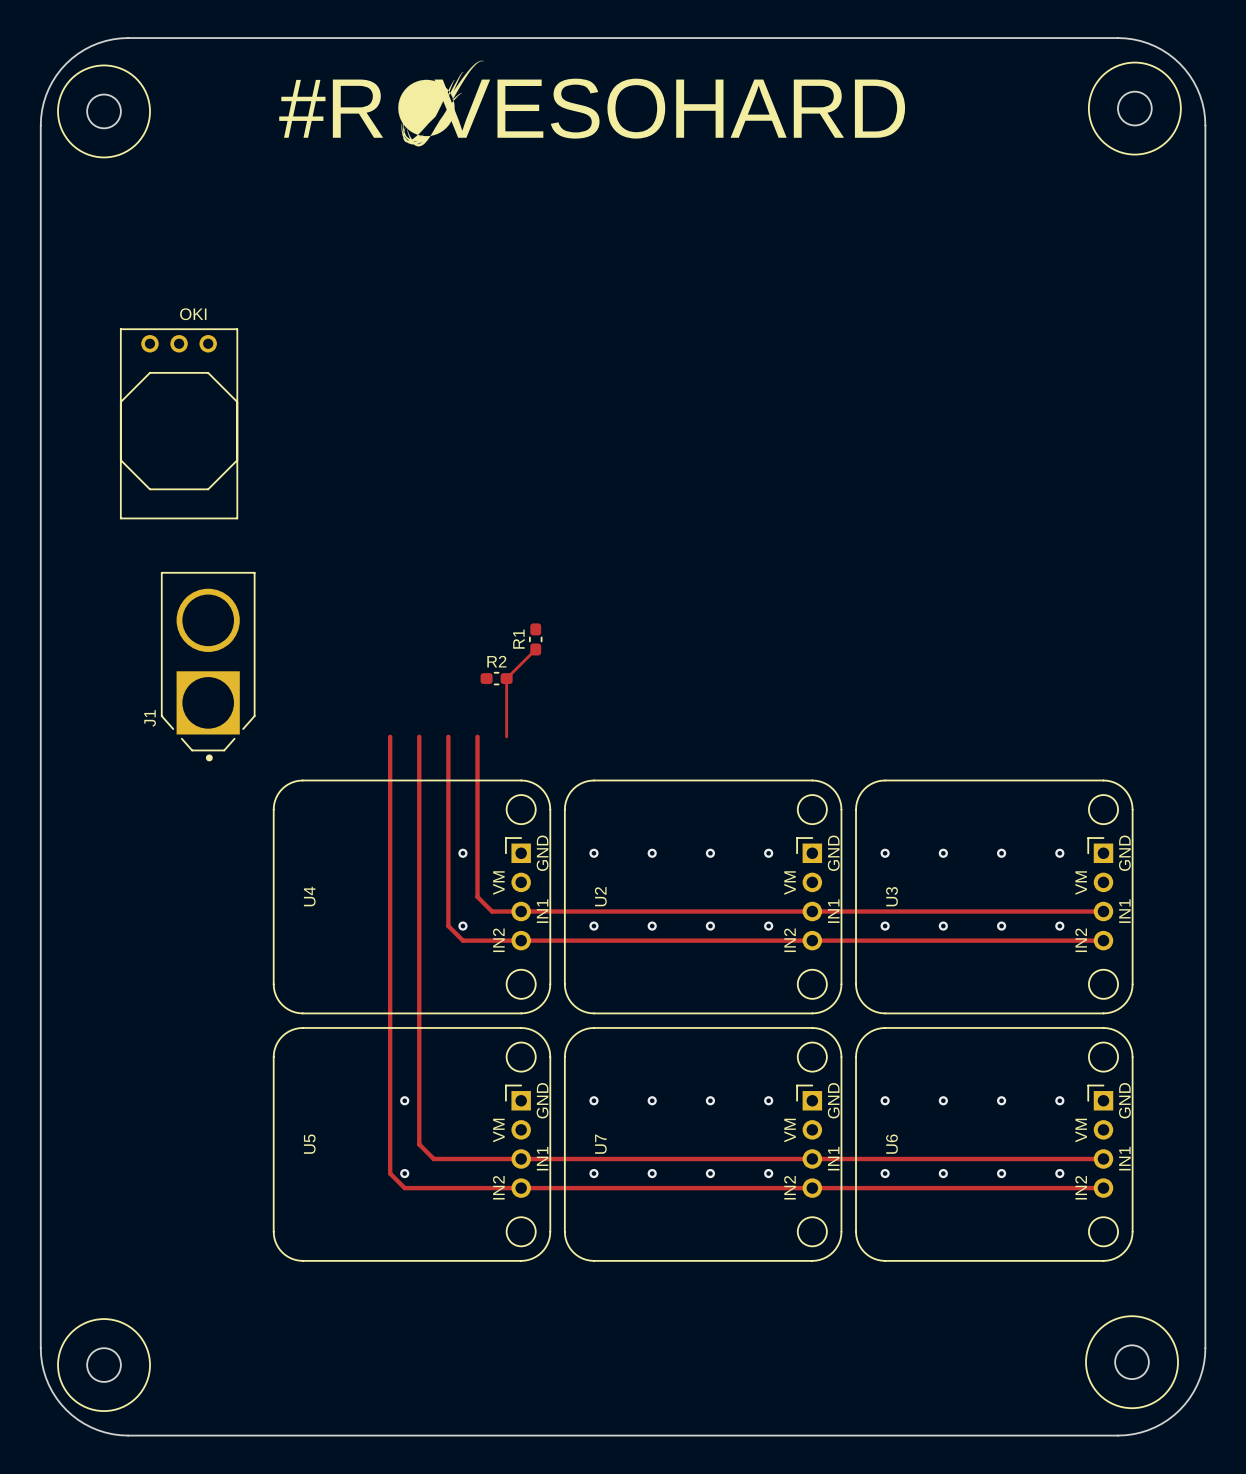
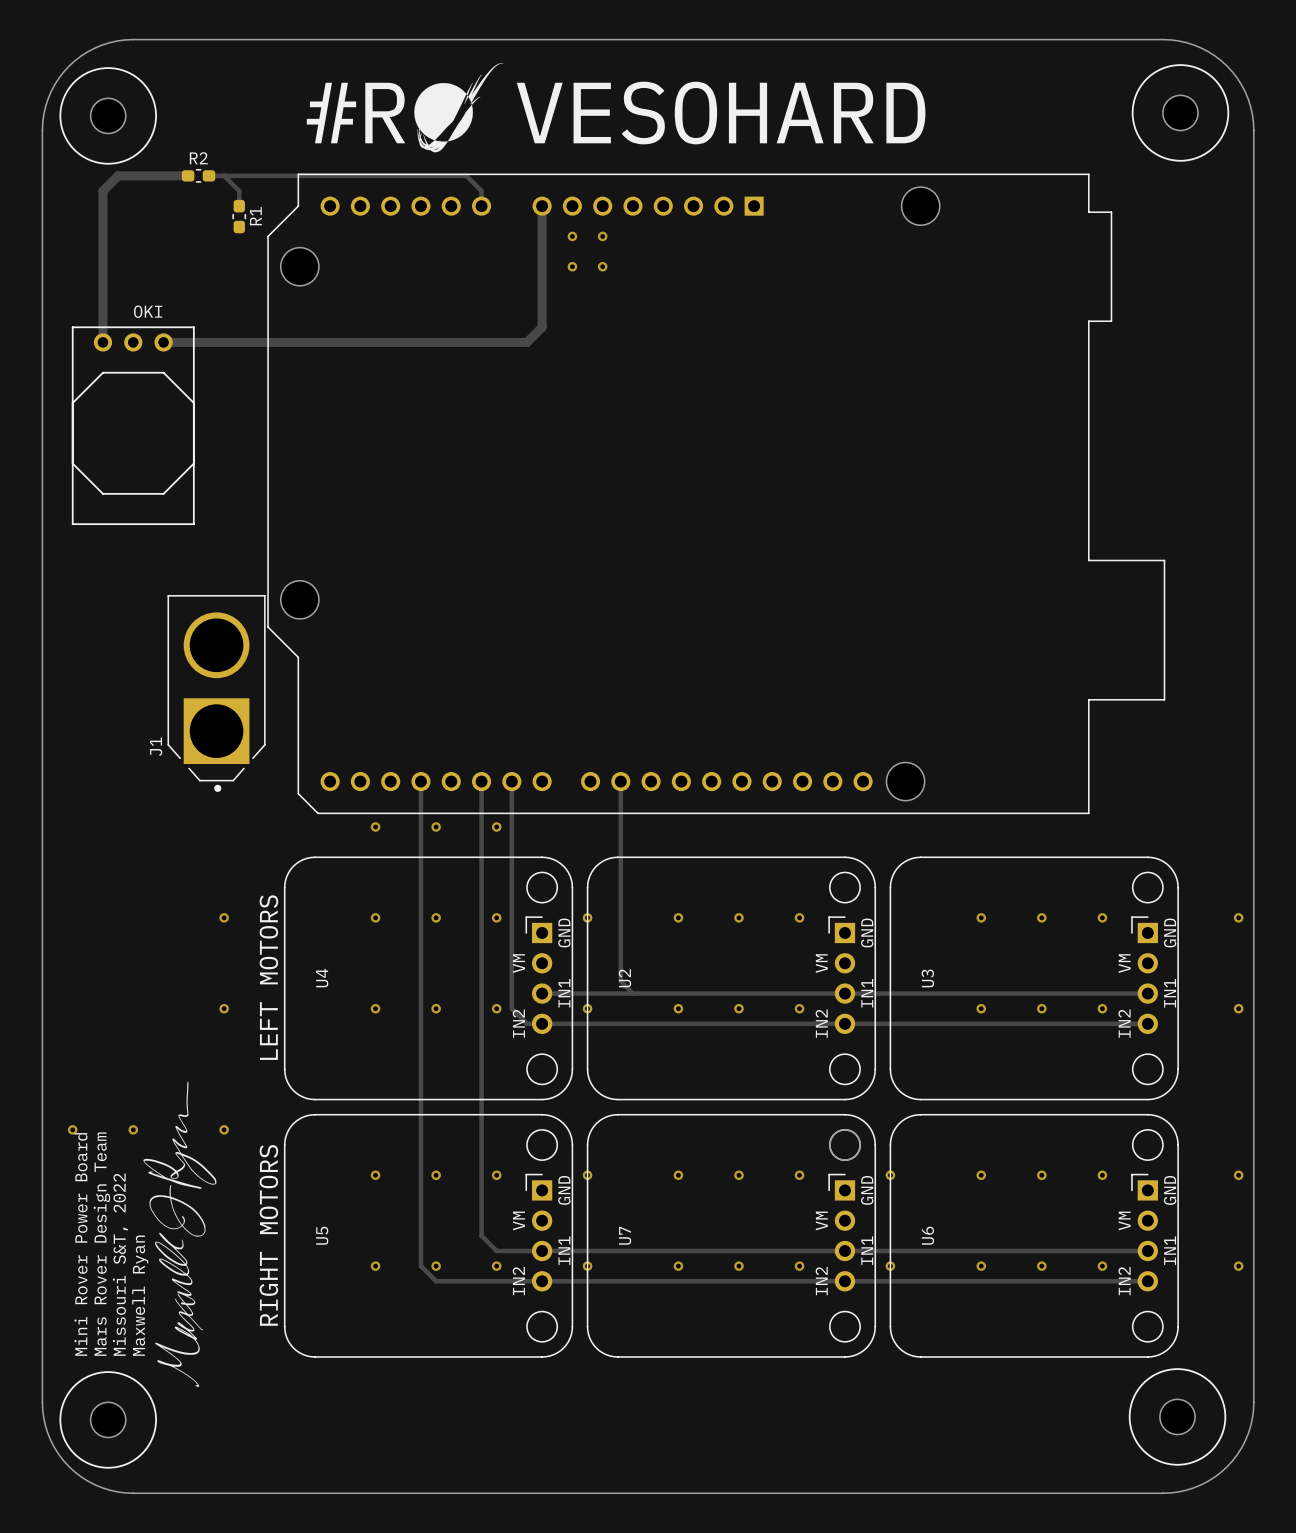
track: none -> (188, 175) (118, 175) (102, 191) (102, 342)
track: none -> (208, 175) (466, 175) (481, 191) (481, 206)
track: none -> (224, 175) (239, 191) (239, 206)
track: none -> (542, 206) (542, 327) (526, 342) (163, 342)
via: none -> (572, 236)
via: none -> (602, 236)
via: none -> (572, 266)
via: none -> (602, 266)
part position: (179, 423) -> (133, 425)
part: none -> (716, 493)
R1 name position: R1 (518, 639) -> R1 (255, 216)
R1 position: (535, 639) -> (239, 216)
track: (535, 649) (506, 678) (506, 736) -> none
R2 position: (496, 678) -> (198, 175)
track: (390, 736) (390, 1173) (404, 1188) (1103, 1188) -> none
track: (419, 736) (419, 1144) (433, 1158) (1103, 1158) -> none
track: (448, 736) (448, 926) (462, 940) (1103, 940) -> none
track: (477, 736) (477, 896) (492, 911) (1103, 911) -> none
track: none -> (420, 781) (420, 1266) (436, 1281) (1147, 1281)
track: none -> (481, 781) (481, 1235) (496, 1250) (1147, 1250)
track: none -> (511, 781) (511, 1008) (526, 1023) (1147, 1023)
track: none -> (620, 781) (620, 981) (632, 993)
via: none -> (375, 826)
via: none -> (436, 826)
via: none -> (496, 826)
via: (462, 853) -> none
via: (593, 853) -> none
via: (652, 853) -> none
via: (710, 853) -> none
via: (768, 853) -> none
via: (885, 853) -> none
via: (943, 853) -> none
via: (1001, 853) -> none
via: (1059, 853) -> none
via: none -> (224, 917)
via: none -> (375, 917)
via: none -> (436, 917)
via: none -> (496, 917)
via: none -> (587, 917)
via: none -> (678, 917)
via: none -> (738, 917)
via: none -> (799, 917)
via: none -> (981, 917)
via: none -> (1041, 917)
via: none -> (1102, 917)
via: none -> (1238, 917)
U4 position: (412, 896) -> (428, 978)
U2 position: (703, 896) -> (731, 978)
U3 position: (994, 896) -> (1034, 978)
via: (462, 926) -> none
via: (593, 926) -> none
via: (652, 926) -> none
via: (710, 926) -> none
via: (768, 926) -> none
via: (885, 926) -> none
via: (943, 926) -> none
via: (1001, 926) -> none
via: (1059, 926) -> none
text: none -> LEFT MOTORS (268, 977)
track: none -> (542, 993) (1147, 993)
via: none -> (224, 1008)
via: none -> (375, 1008)
via: none -> (436, 1008)
via: none -> (496, 1008)
via: none -> (587, 1008)
via: none -> (678, 1008)
via: none -> (738, 1008)
via: none -> (799, 1008)
via: none -> (981, 1008)
via: none -> (1041, 1008)
via: none -> (1102, 1008)
via: none -> (1238, 1008)
drawing: none -> [143, 1081, 217, 1387]
round board edge: none -> [829, 1129, 861, 1161]
via: none -> (72, 1129)
via: none -> (133, 1129)
via: none -> (224, 1129)
via: (404, 1100) -> none
via: (593, 1100) -> none
via: (652, 1100) -> none
via: (710, 1100) -> none
via: (768, 1100) -> none
via: (885, 1100) -> none
via: (943, 1100) -> none
via: (1001, 1100) -> none
via: (1059, 1100) -> none
via: none -> (375, 1175)
via: none -> (436, 1175)
via: none -> (496, 1175)
via: none -> (587, 1175)
via: none -> (678, 1175)
via: none -> (738, 1175)
via: none -> (799, 1175)
via: none -> (890, 1175)
via: none -> (981, 1175)
via: none -> (1041, 1175)
via: none -> (1102, 1175)
via: none -> (1238, 1175)
U5 position: (412, 1144) -> (428, 1235)
U7 position: (703, 1144) -> (731, 1235)
U6 position: (994, 1144) -> (1034, 1235)
via: (404, 1173) -> none
via: (593, 1173) -> none
via: (652, 1173) -> none
via: (710, 1173) -> none
via: (768, 1173) -> none
via: (885, 1173) -> none
via: (943, 1173) -> none
via: (1001, 1173) -> none
via: (1059, 1173) -> none
text: none -> RIGHT MOTORS (268, 1235)
text: none -> Mars Rover Design Team (101, 1244)
text: none -> Mini Rover Power Board (81, 1244)
via: none -> (375, 1266)
via: none -> (436, 1266)
via: none -> (496, 1266)
via: none -> (587, 1266)
via: none -> (678, 1266)
via: none -> (738, 1266)
via: none -> (799, 1266)
via: none -> (890, 1266)
via: none -> (981, 1266)
via: none -> (1041, 1266)
via: none -> (1102, 1266)
via: none -> (1238, 1266)
text: none -> Missouri S&T, 2022 (120, 1264)
text: none -> Maxwell Ryan (140, 1295)

